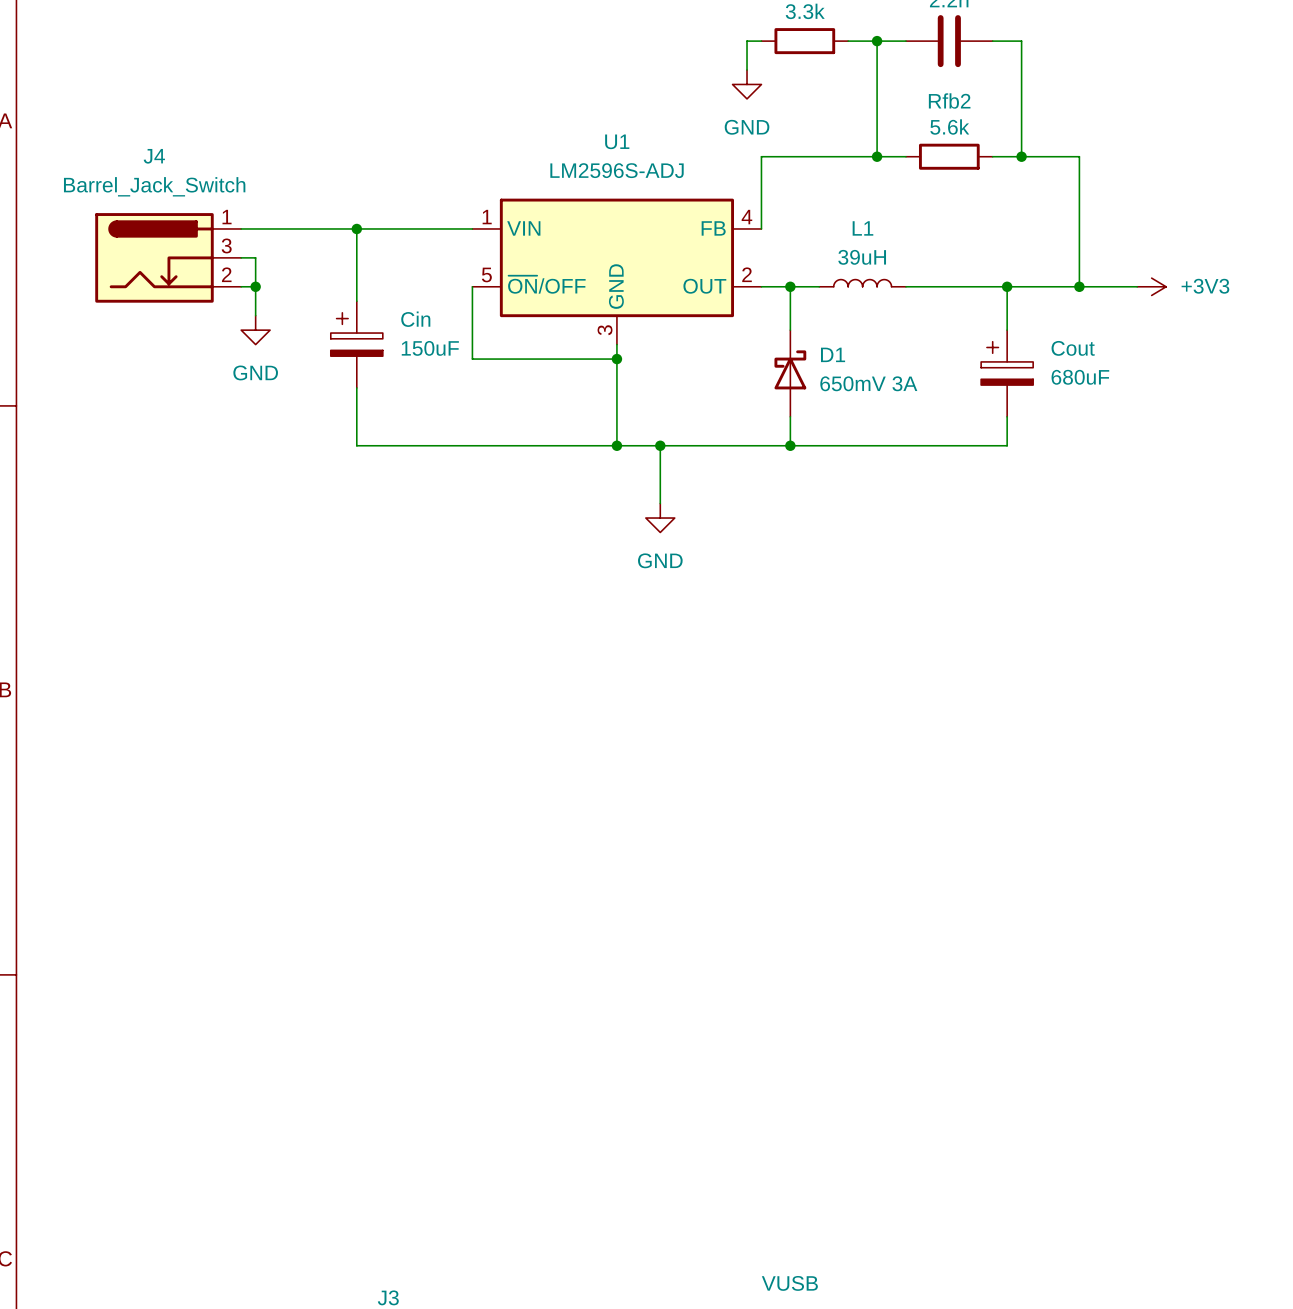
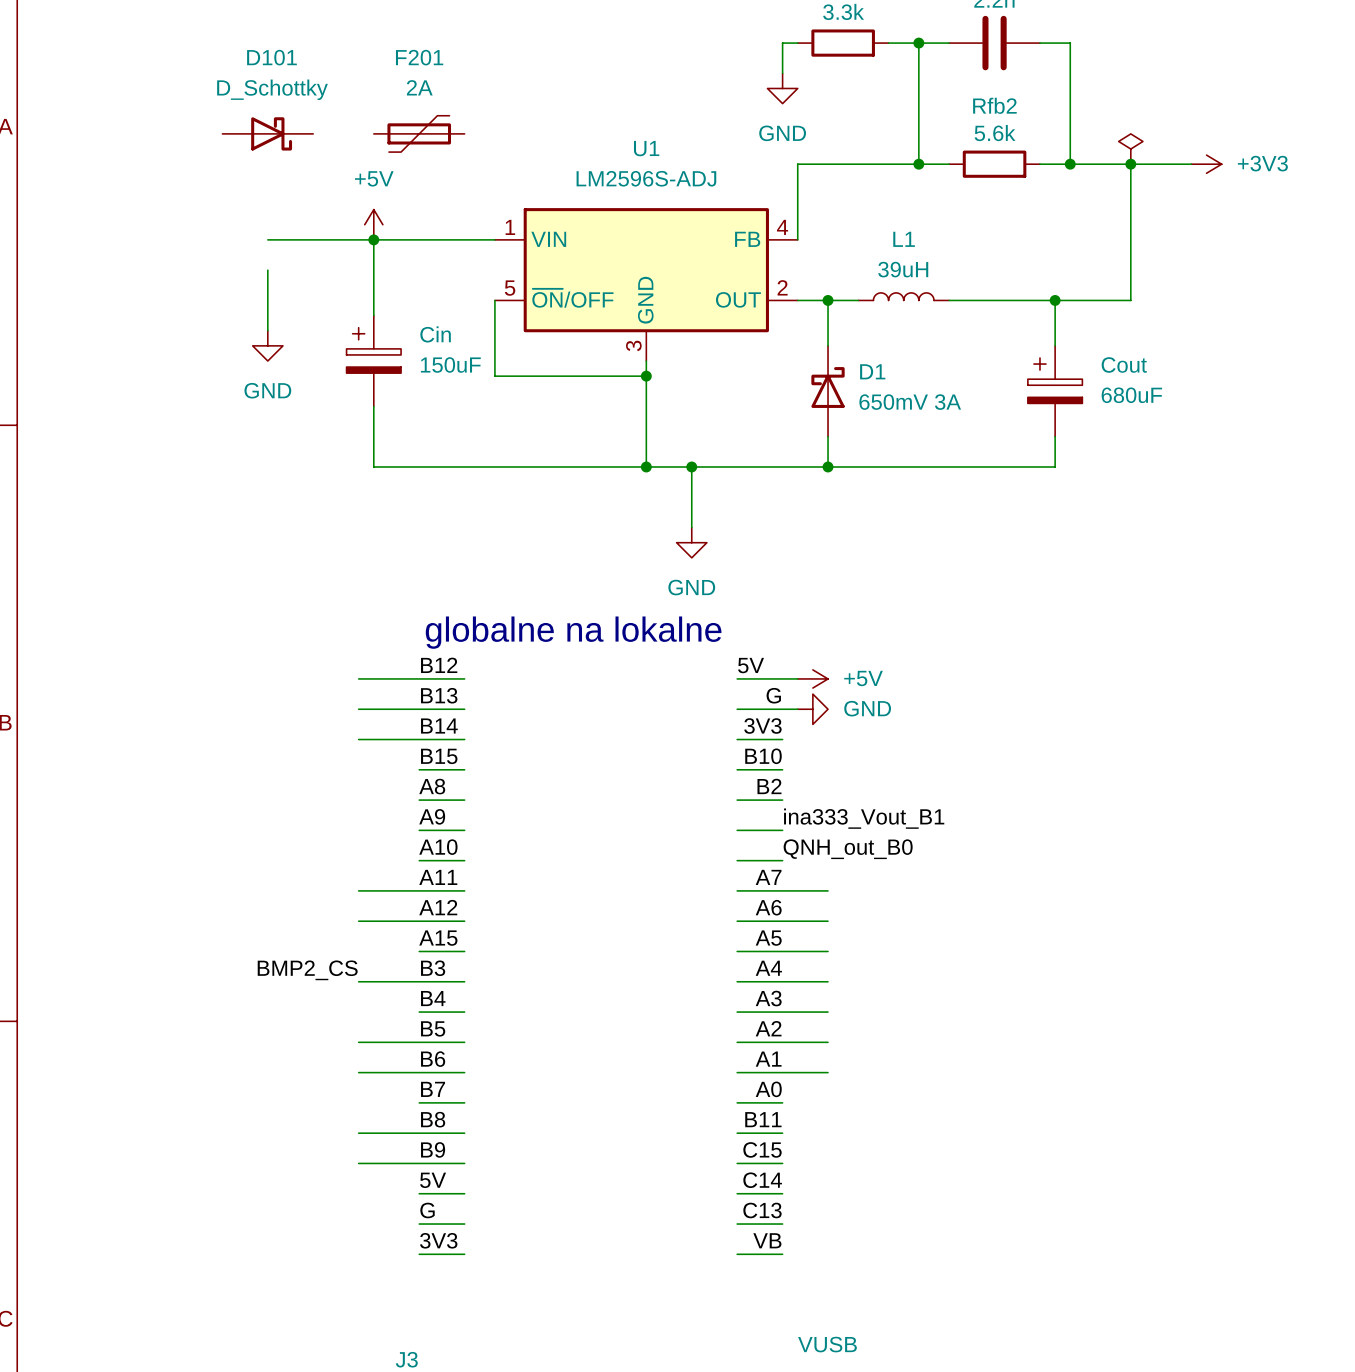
D101: none -> D_Schottky (267, 133)
F201: none -> 2A (419, 133)
power symbol: none -> (1130, 149)
junction: none -> (1130, 164)
power symbol: none -> +5V (373, 224)
wire: (241, 228) (255, 228) -> none
J4: Barrel_Jack_Switch (168, 257) -> none
wire: (241, 257) (255, 257) -> none
wire: (241, 286) (255, 286) -> none
junction: (255, 286) -> none
wire: (1079, 286) (1137, 286) -> (1130, 164) (1191, 164)
junction: (1079, 286) -> none
power symbol position: +3V3 (1151, 286) -> +3V3 (1206, 164)
text: none -> globalne na lokalne (573, 632)
label: none -> B12 (439, 665)
label: none -> 5V (751, 665)
wire: none -> (358, 678) (464, 678)
wire: none -> (737, 678) (797, 678)
power symbol: none -> +5V (812, 678)
label: none -> B13 (439, 695)
label: none -> G (773, 695)
wire: none -> (358, 709) (464, 709)
wire: none -> (737, 709) (797, 709)
power symbol: none -> GND (812, 709)
label: none -> 3V3 (762, 726)
label: none -> B14 (439, 726)
wire: none -> (358, 739) (464, 739)
wire: none -> (737, 739) (782, 739)
label: none -> B10 (763, 756)
label: none -> B15 (439, 756)
wire: none -> (419, 769) (464, 769)
wire: none -> (737, 769) (782, 769)
label: none -> A8 (432, 786)
label: none -> B2 (769, 786)
wire: none -> (419, 800) (464, 800)
wire: none -> (737, 800) (782, 800)
label: none -> A9 (432, 816)
label: none -> ina333_Vout_B1 (864, 818)
wire: none -> (419, 830) (464, 830)
wire: none -> (737, 830) (782, 830)
label: none -> A10 (438, 847)
label: none -> QNH_out_B0 (848, 849)
wire: none -> (419, 860) (464, 860)
wire: none -> (737, 860) (782, 860)
label: none -> A11 (438, 877)
label: none -> A7 (768, 877)
wire: none -> (358, 890) (464, 890)
wire: none -> (737, 890) (828, 890)
label: none -> A12 (438, 907)
label: none -> A6 (768, 907)
wire: none -> (358, 921) (464, 921)
wire: none -> (737, 921) (828, 921)
label: none -> A15 (438, 938)
label: none -> A5 (768, 938)
wire: none -> (419, 951) (464, 951)
wire: none -> (737, 951) (828, 951)
label: none -> B3 (433, 968)
label: none -> A4 (768, 968)
label: none -> BMP2_CS (307, 970)
wire: none -> (358, 981) (464, 981)
wire: none -> (737, 981) (828, 981)
label: none -> B4 (433, 998)
label: none -> A3 (768, 998)
wire: none -> (419, 1012) (464, 1012)
wire: none -> (737, 1012) (828, 1012)
label: none -> A2 (768, 1028)
label: none -> B5 (433, 1028)
wire: none -> (358, 1042) (464, 1042)
wire: none -> (737, 1042) (828, 1042)
label: none -> B6 (433, 1059)
label: none -> A1 (768, 1059)
wire: none -> (358, 1072) (464, 1072)
wire: none -> (737, 1072) (828, 1072)
label: none -> B7 (433, 1089)
label: none -> A0 (768, 1089)
wire: none -> (419, 1102) (464, 1102)
wire: none -> (737, 1102) (782, 1102)
label: none -> B8 (433, 1119)
label: none -> B11 (763, 1119)
wire: none -> (358, 1133) (464, 1133)
wire: none -> (737, 1133) (782, 1133)
label: none -> B9 (433, 1149)
label: none -> C15 (762, 1149)
wire: none -> (358, 1163) (464, 1163)
wire: none -> (737, 1163) (782, 1163)
label: none -> 5V (433, 1180)
label: none -> C14 (762, 1180)
wire: none -> (419, 1193) (464, 1193)
wire: none -> (737, 1193) (782, 1193)
label: none -> G (427, 1210)
label: none -> C13 (762, 1210)
wire: none -> (419, 1224) (464, 1224)
wire: none -> (737, 1224) (782, 1224)
label: none -> 3V3 (438, 1240)
label: none -> VB (767, 1240)
wire: none -> (419, 1254) (464, 1254)
wire: none -> (737, 1254) (782, 1254)

